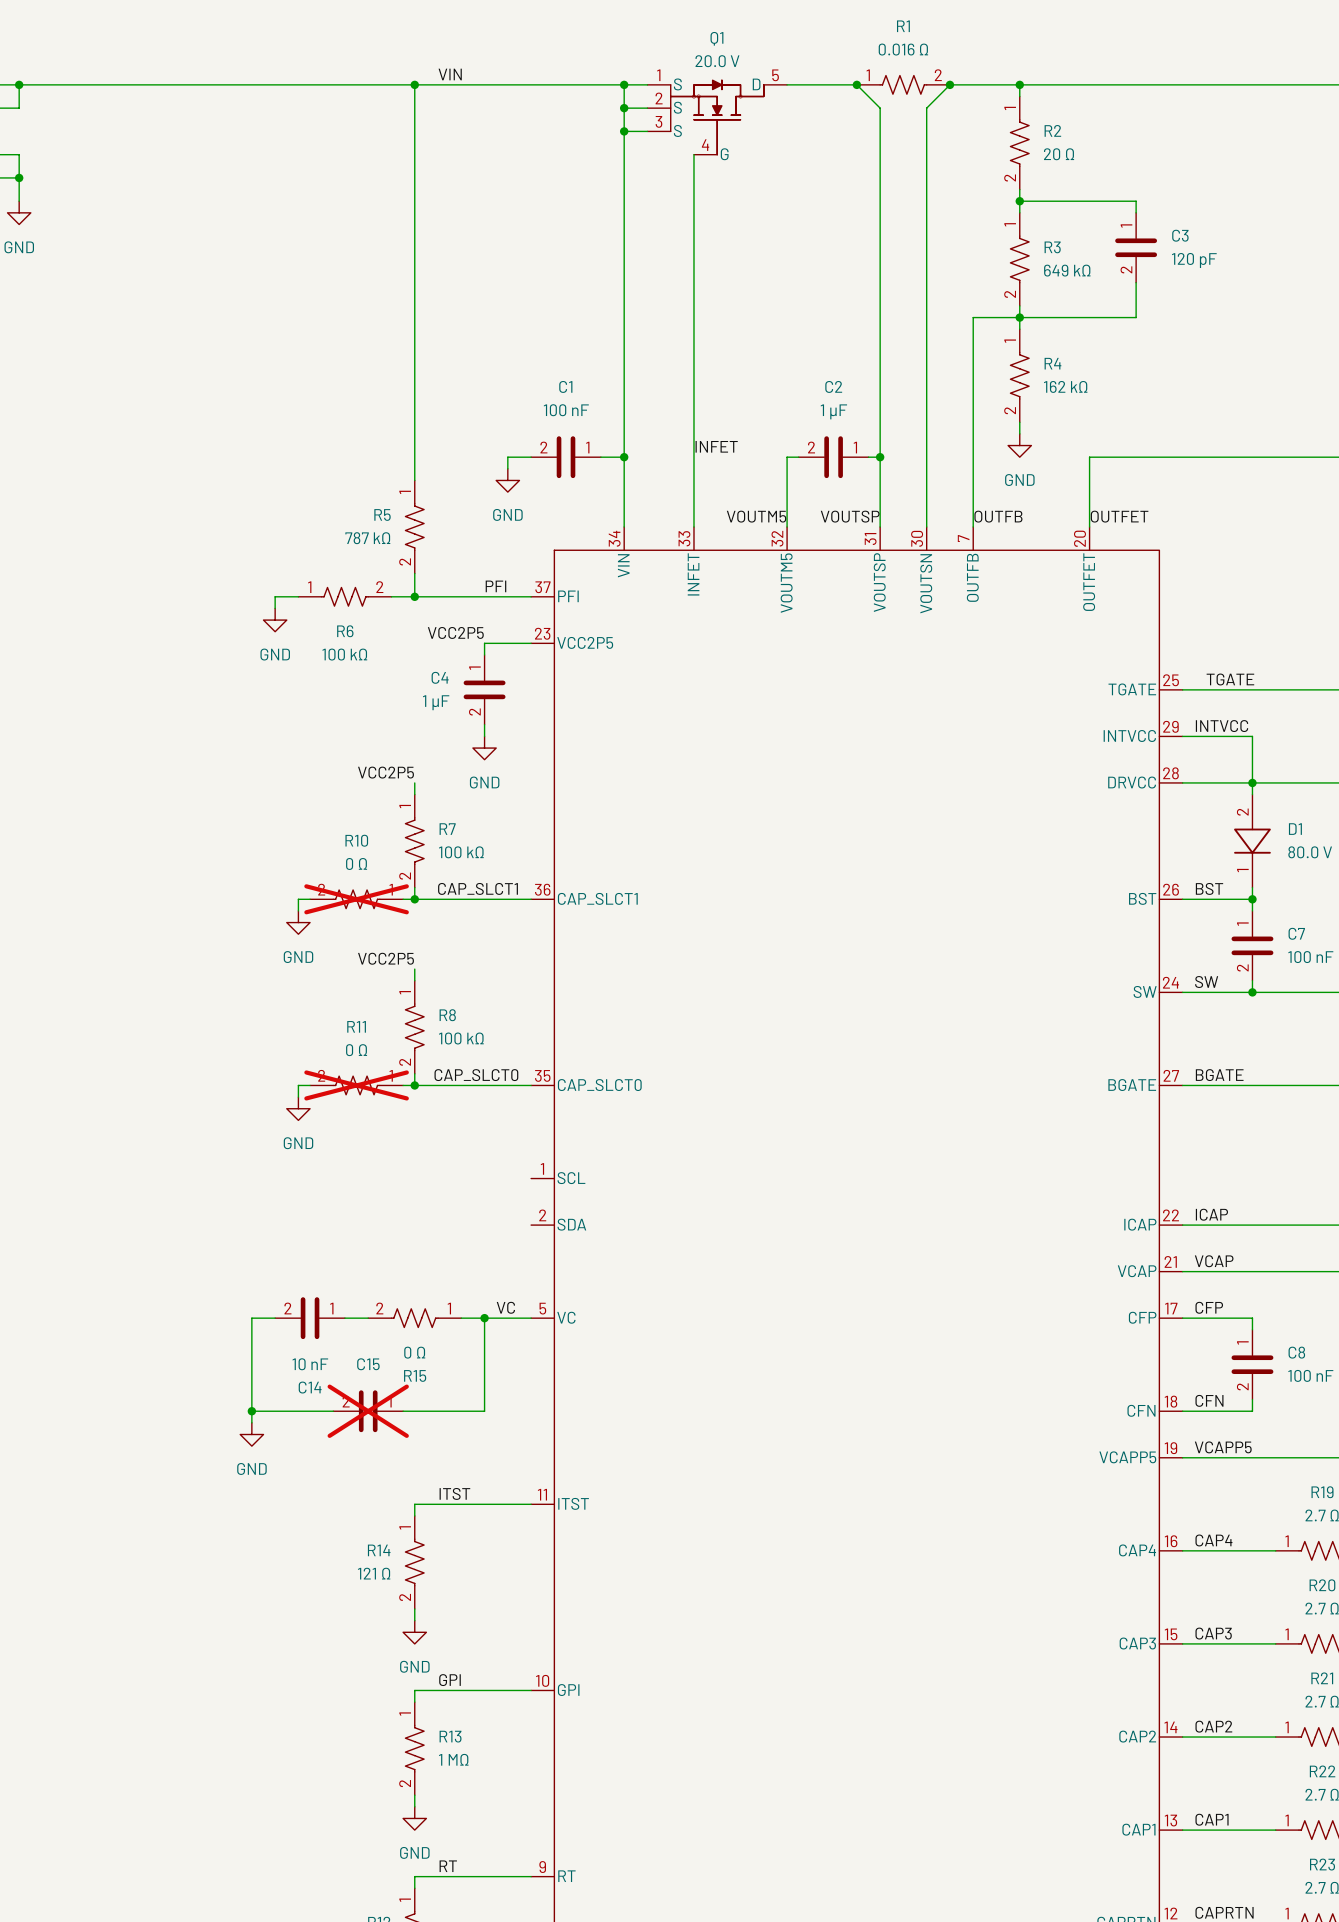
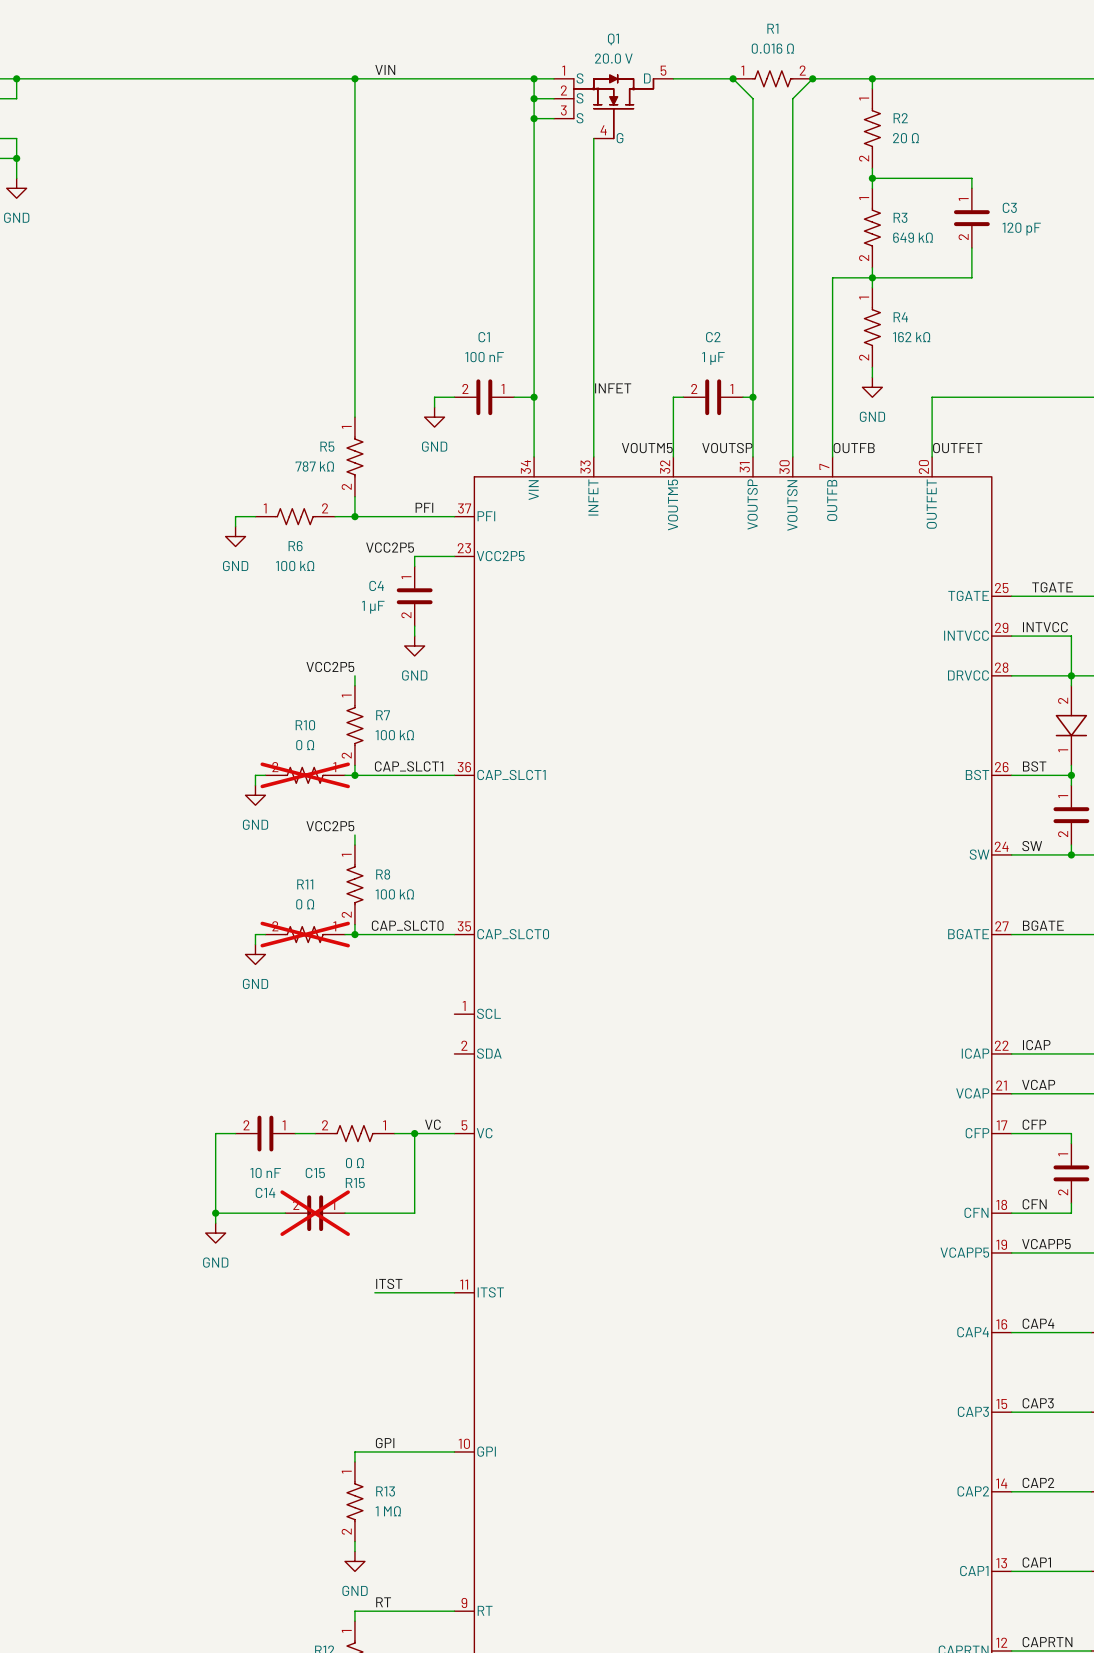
wire: (438, 1504) (414, 1504) (414, 1515) -> none
R14: 121 Ω (414, 1562) -> none
wire: (414, 1609) (414, 1620) -> none
power symbol: GND (414, 1632) -> none

